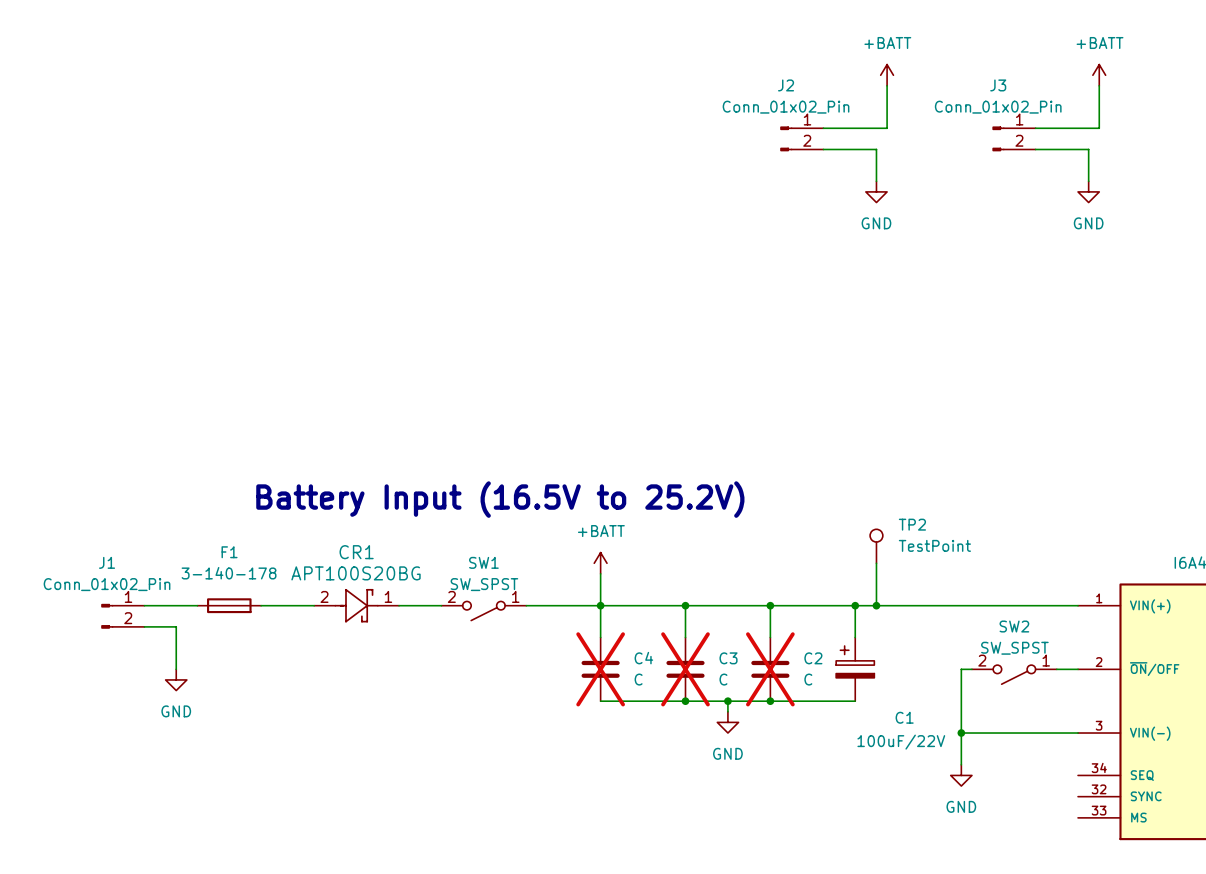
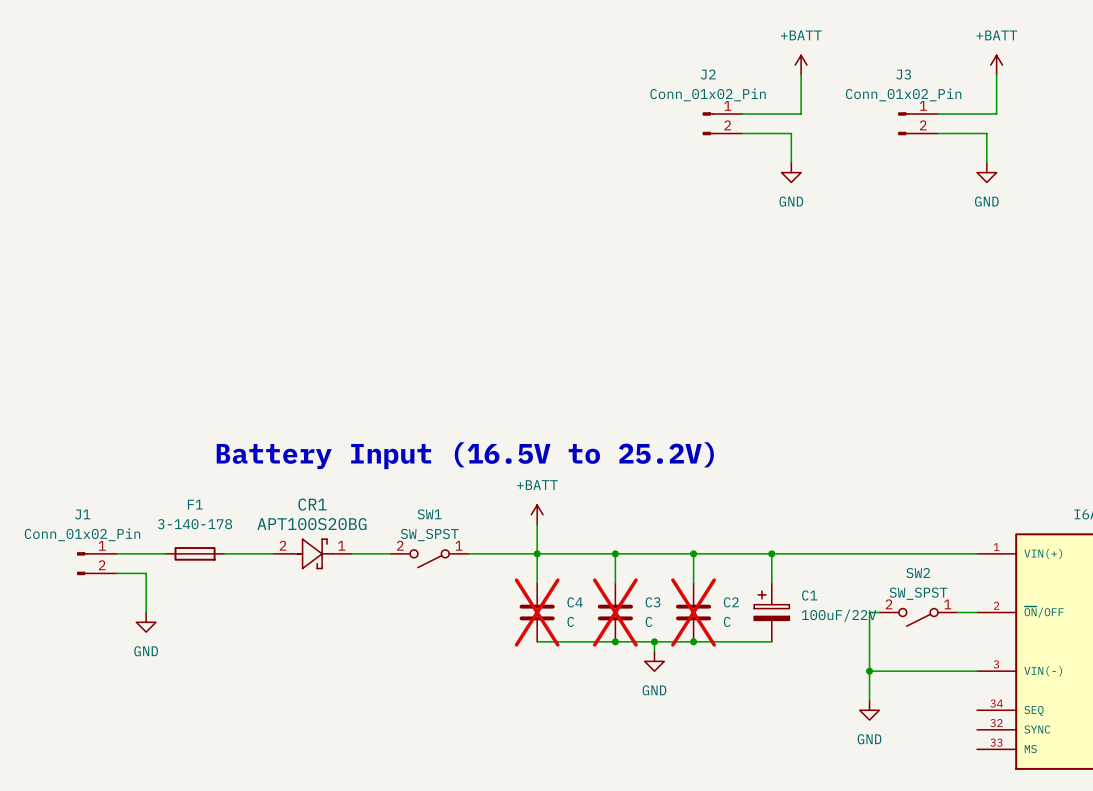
TP2: TestPoint (876, 546) -> none
wire: (876, 563) (876, 605) -> none
junction: (876, 605) -> none
C1 name position: C1 (904, 717) -> C1 (809, 595)
C1 value position: 100uF/22V (901, 742) -> 100uF/22V (839, 615)

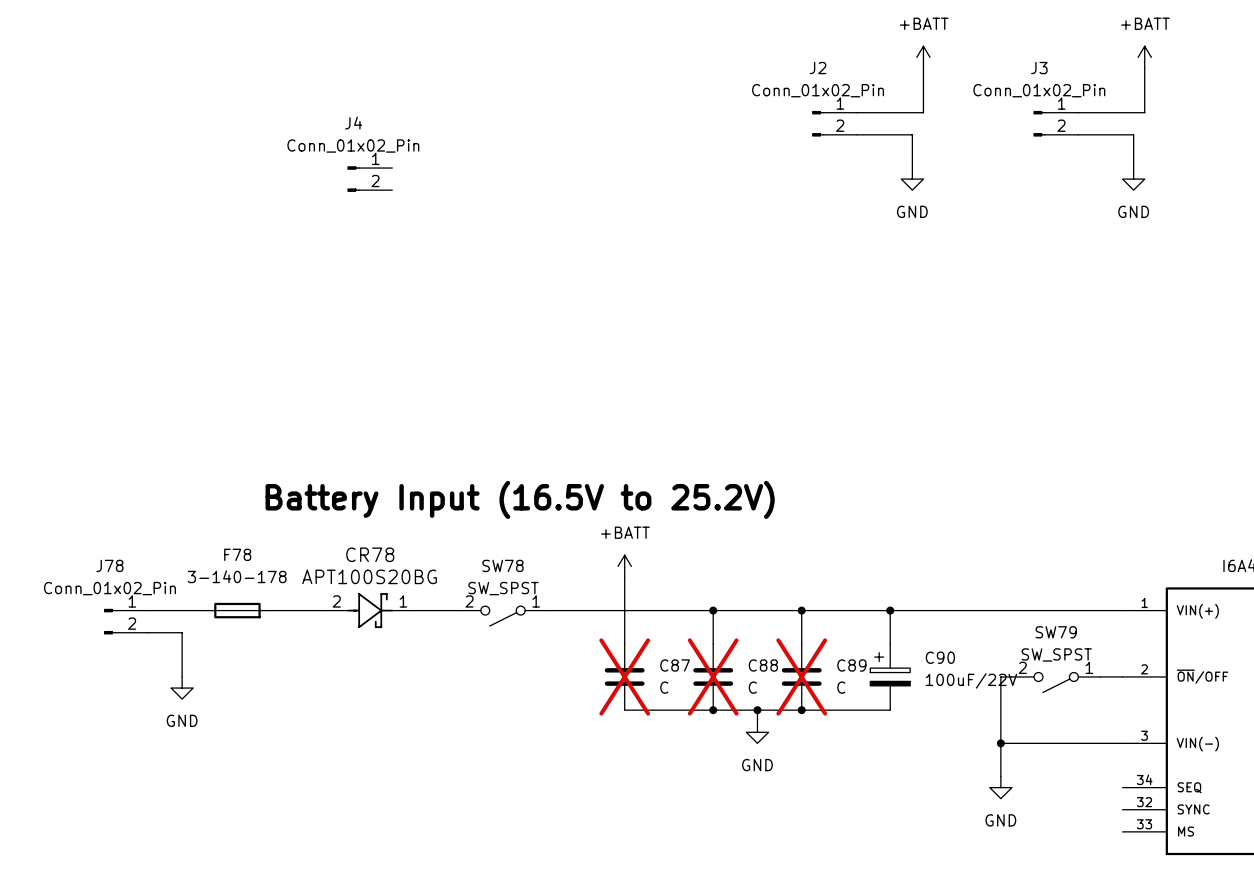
J4: none -> Conn_01x02_Pin (369, 179)
F1 name: F1 (195, 504) -> F78 (237, 554)
CR1 name: CR1 (312, 504) -> CR78 (370, 554)
J1 name: J1 (82, 514) -> J78 (109, 565)
SW1 name: SW1 (429, 514) -> SW78 (502, 565)
junction: (537, 553) -> none
SW2 name: SW2 (918, 573) -> SW79 (1056, 632)
C1 name: C1 (809, 595) -> C90 (940, 657)
C4 name: C4 (575, 602) -> C87 (675, 665)
C3 name: C3 (653, 602) -> C88 (763, 665)
C2 name: C2 (731, 602) -> C89 (851, 665)

